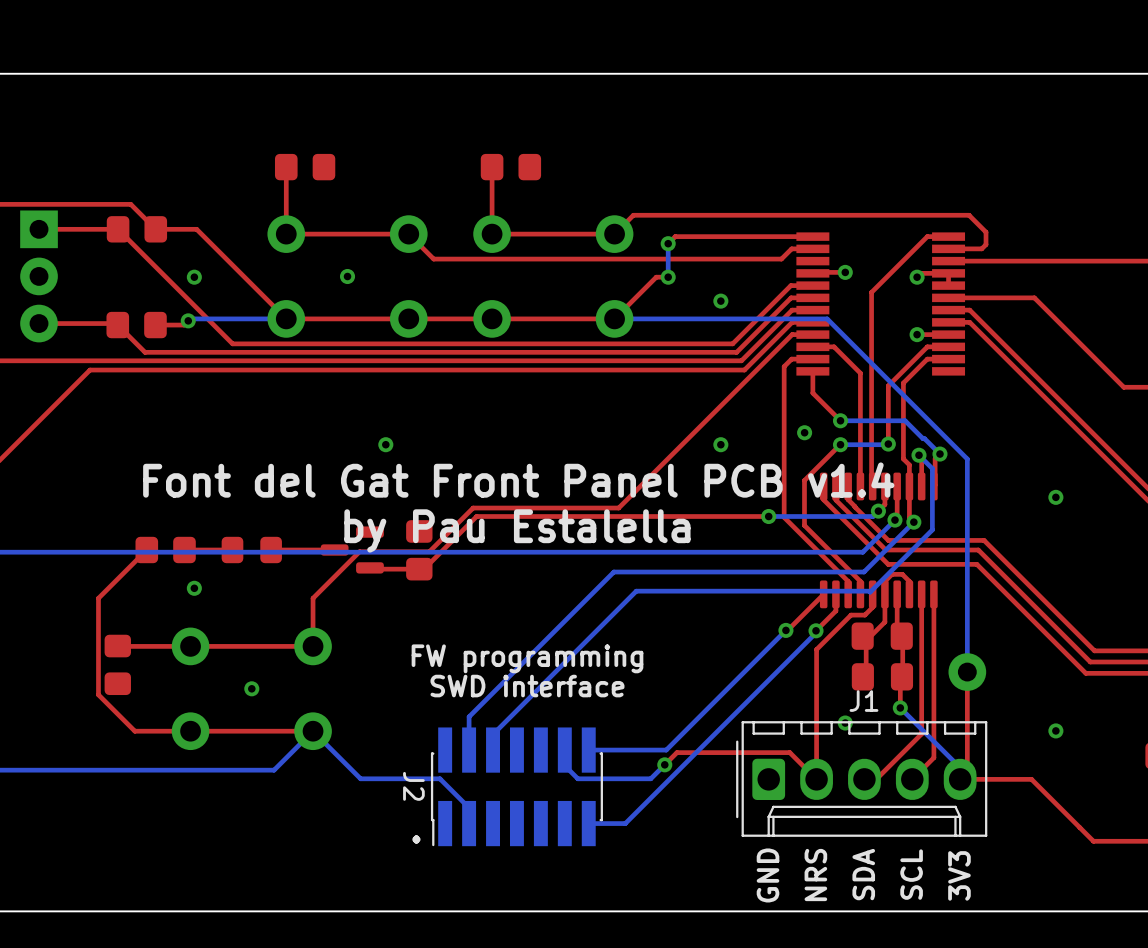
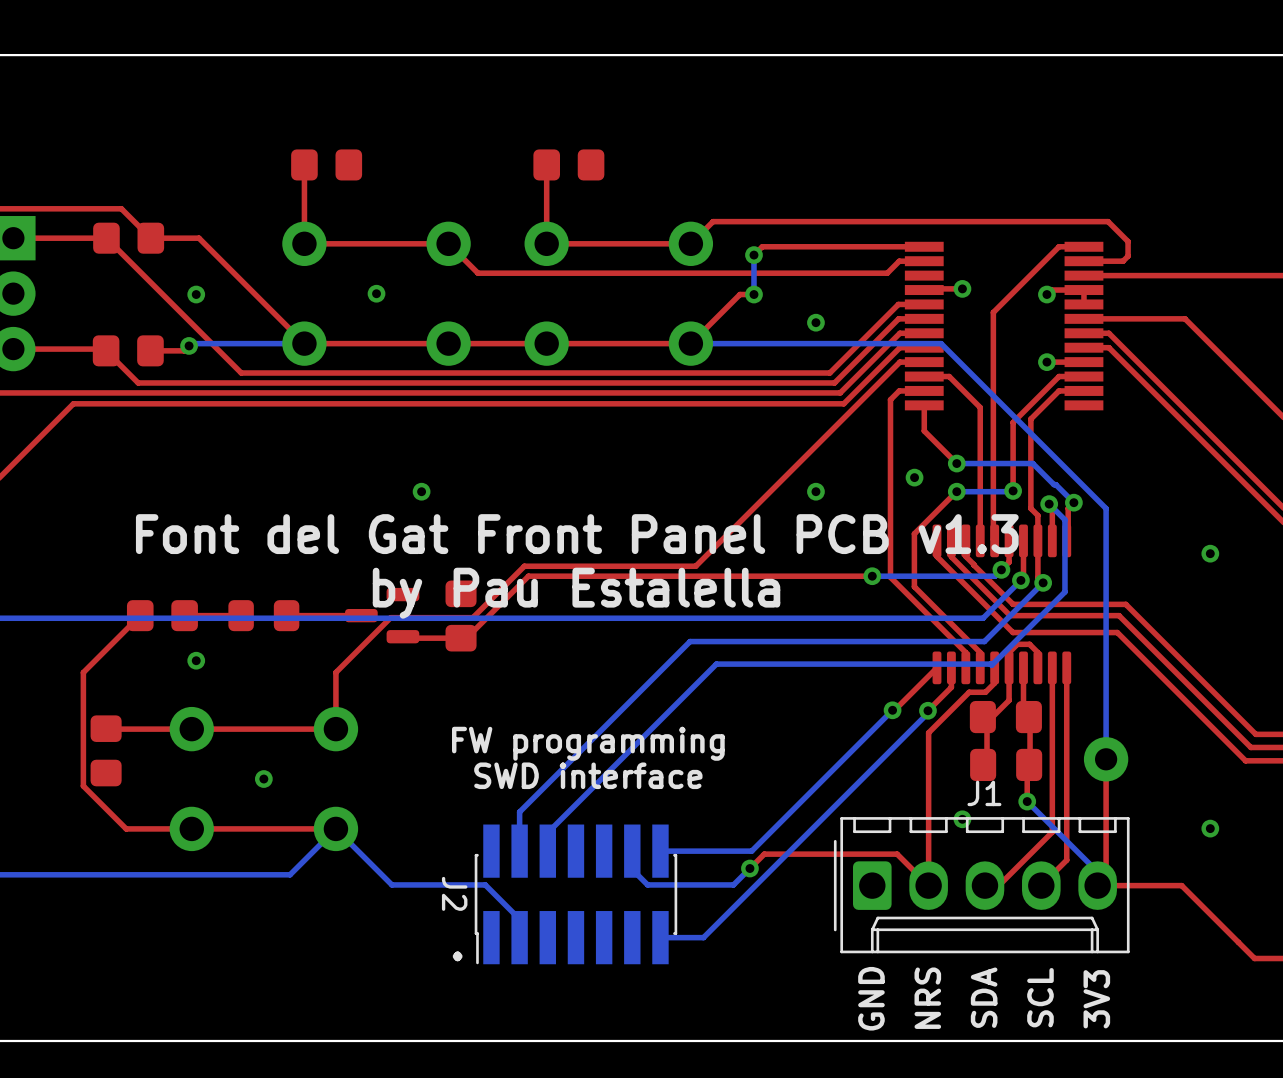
text: Font del Gat Front Panel PCB v1.4 (518, 480) -> Font del Gat Front Panel PCB v1.3 (577, 534)

